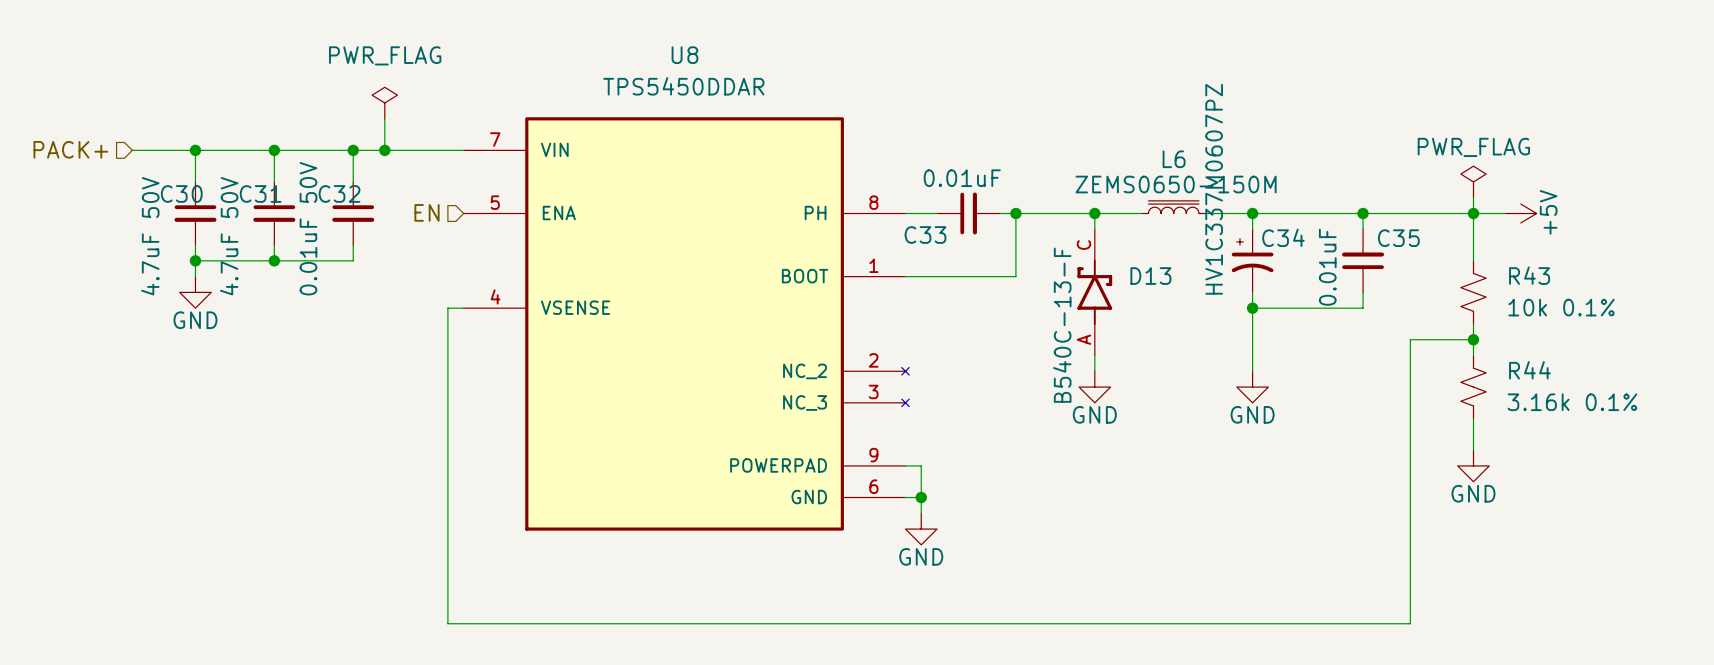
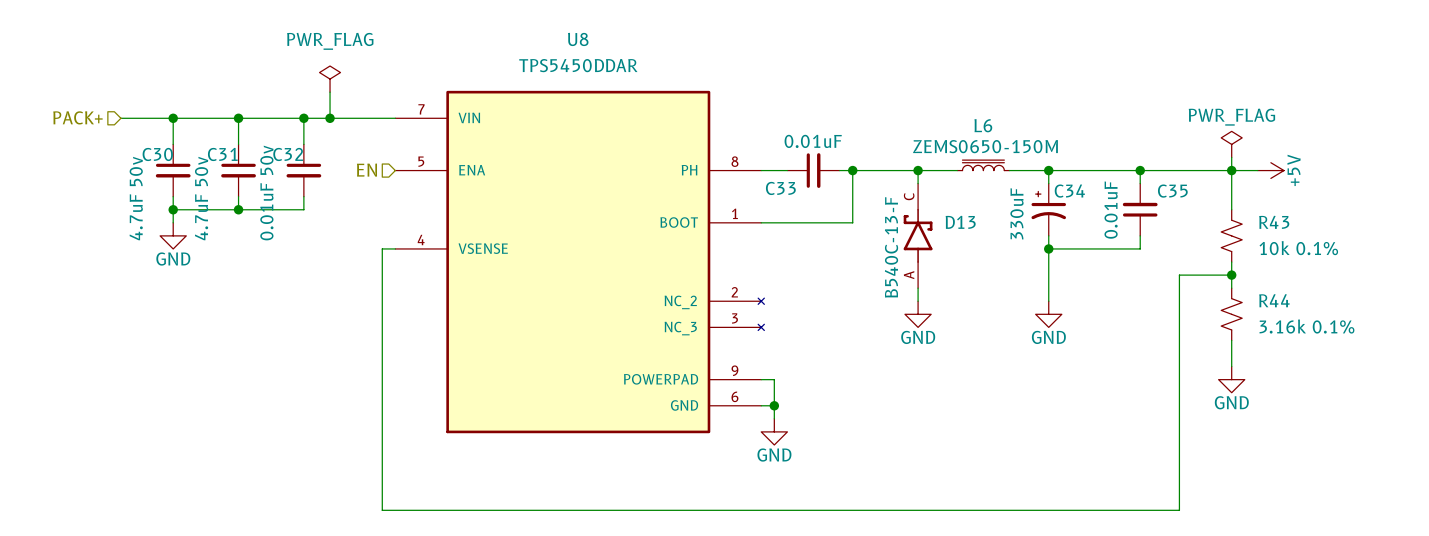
C34 value: HV1C337M0607PZ (1214, 189) -> 330uF (1016, 213)
C32 value: 0.01uF 50V (308, 228) -> 0.01uF 50v (266, 193)
C30 value: 4.7uF 50V (150, 236) -> 4.7uF 50v (136, 198)
C31 value: 4.7uF 50V (229, 236) -> 4.7uF 50v (201, 198)

